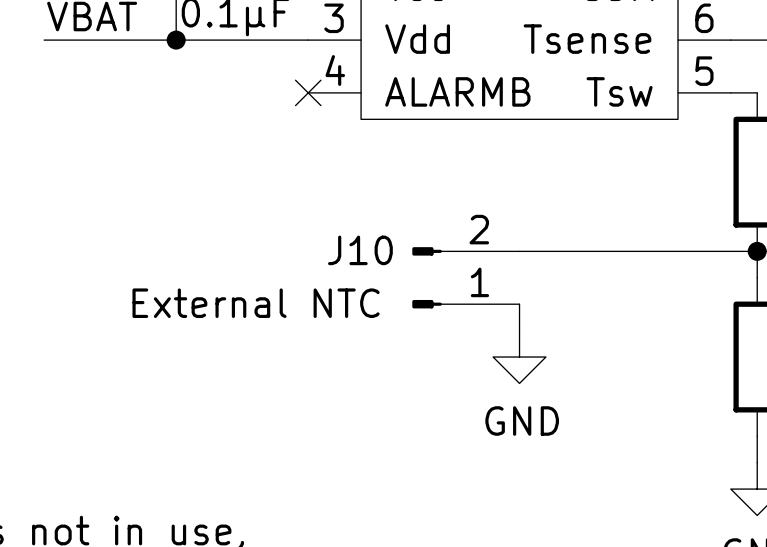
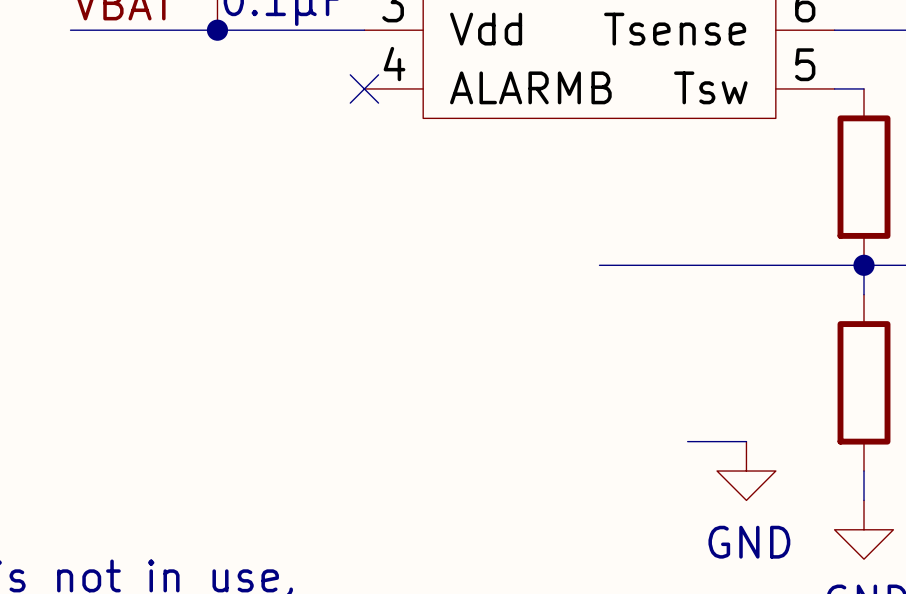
J10: External NTC (465, 277) -> none
wire: (519, 304) (519, 330) -> none
power symbol position: GND (519, 357) -> GND (746, 471)
wire: none -> (687, 441) (746, 441)

